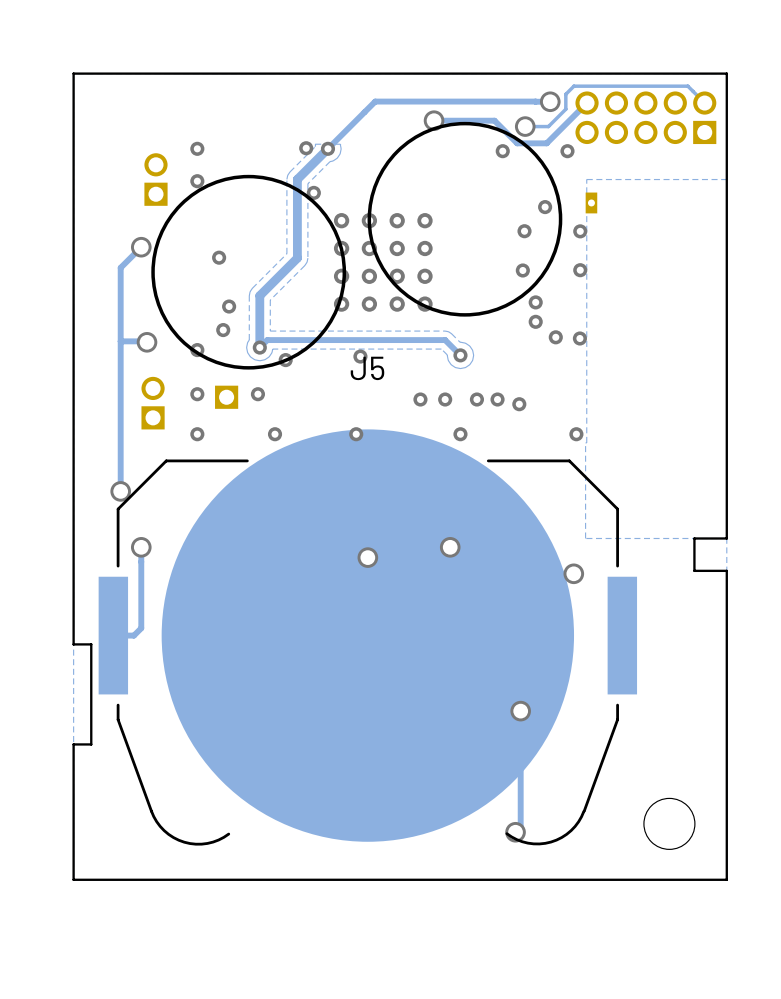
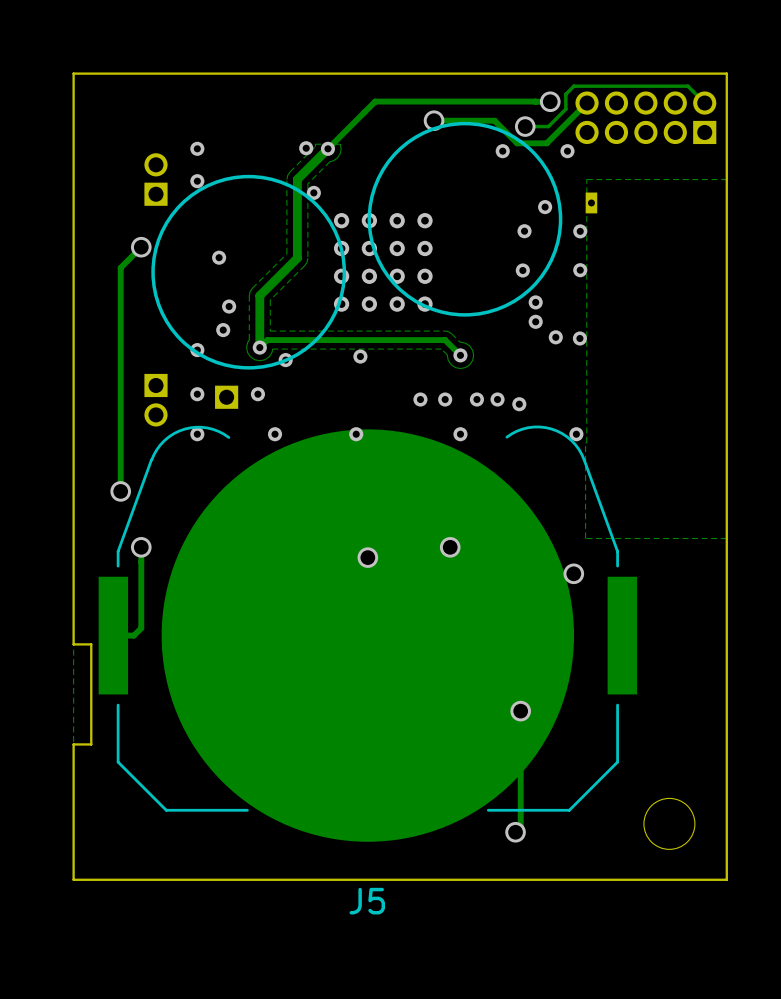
track: (120, 341) (147, 342) -> none
via: (147, 342) -> none
part rotation: 0° (153, 403) -> 180° (155, 400)
board edge: (726, 538) (694, 538) (694, 570) (726, 570) -> (726, 538) (726, 570)
J5 rotation: 0° (367, 637) -> 180° (367, 633)

